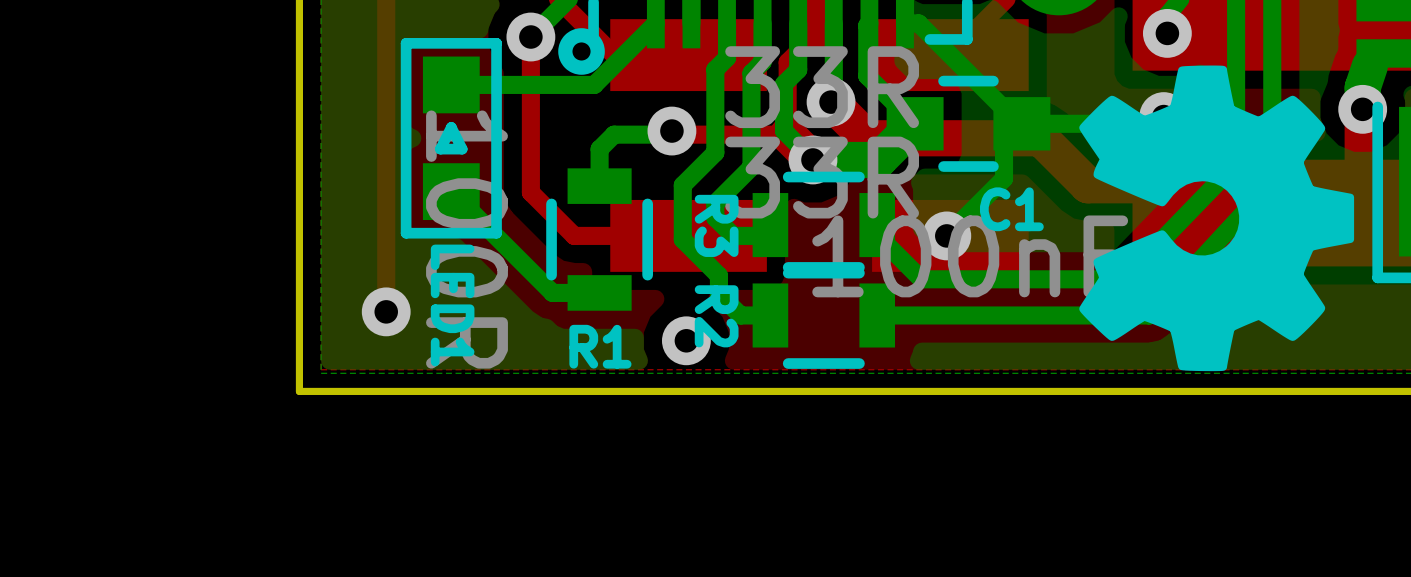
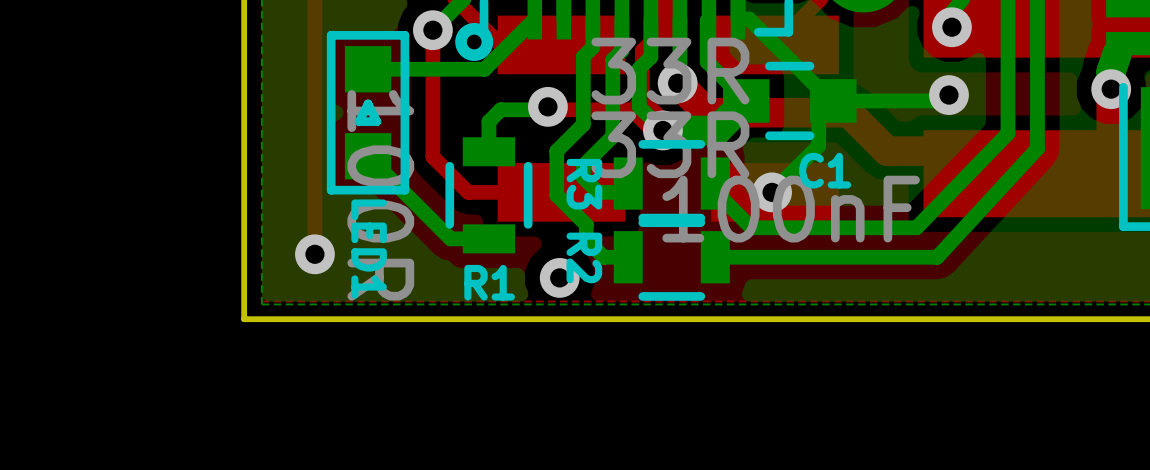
drawing: [1079, 65, 1355, 372] -> none

